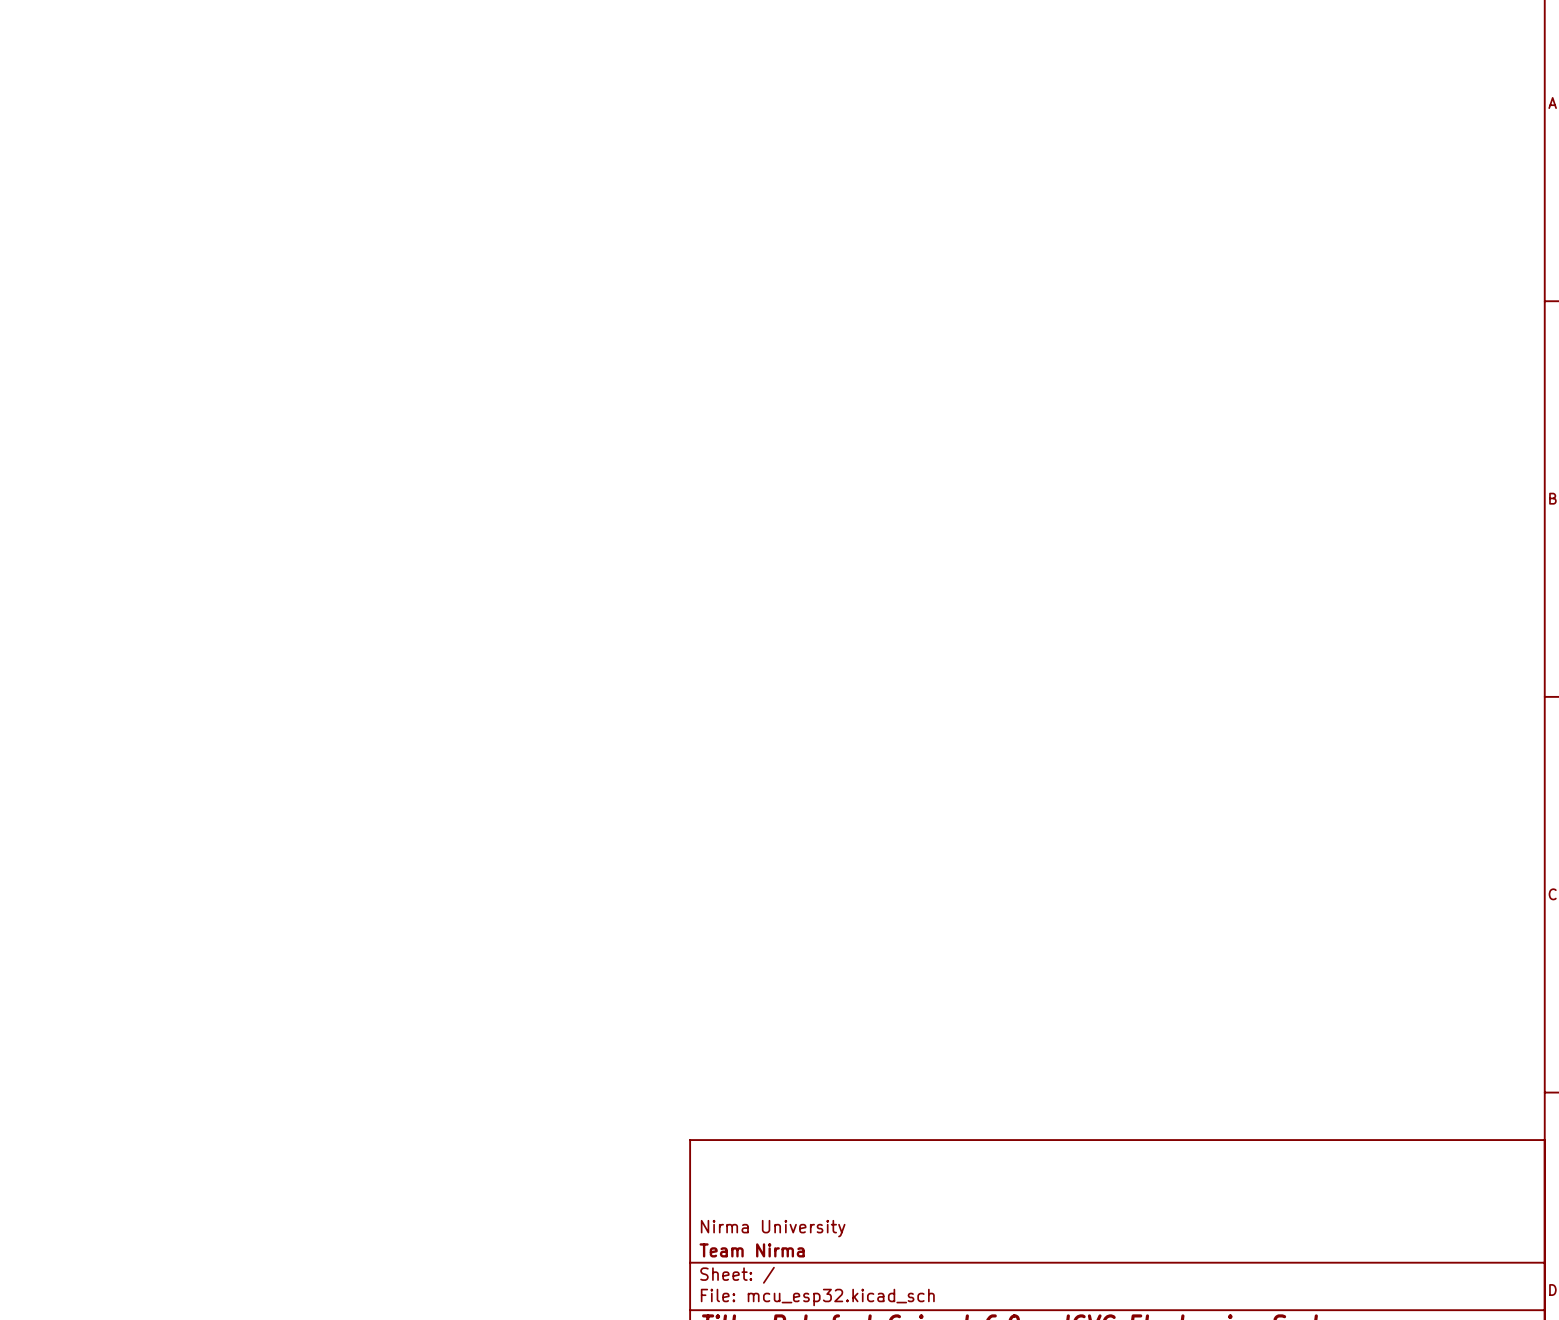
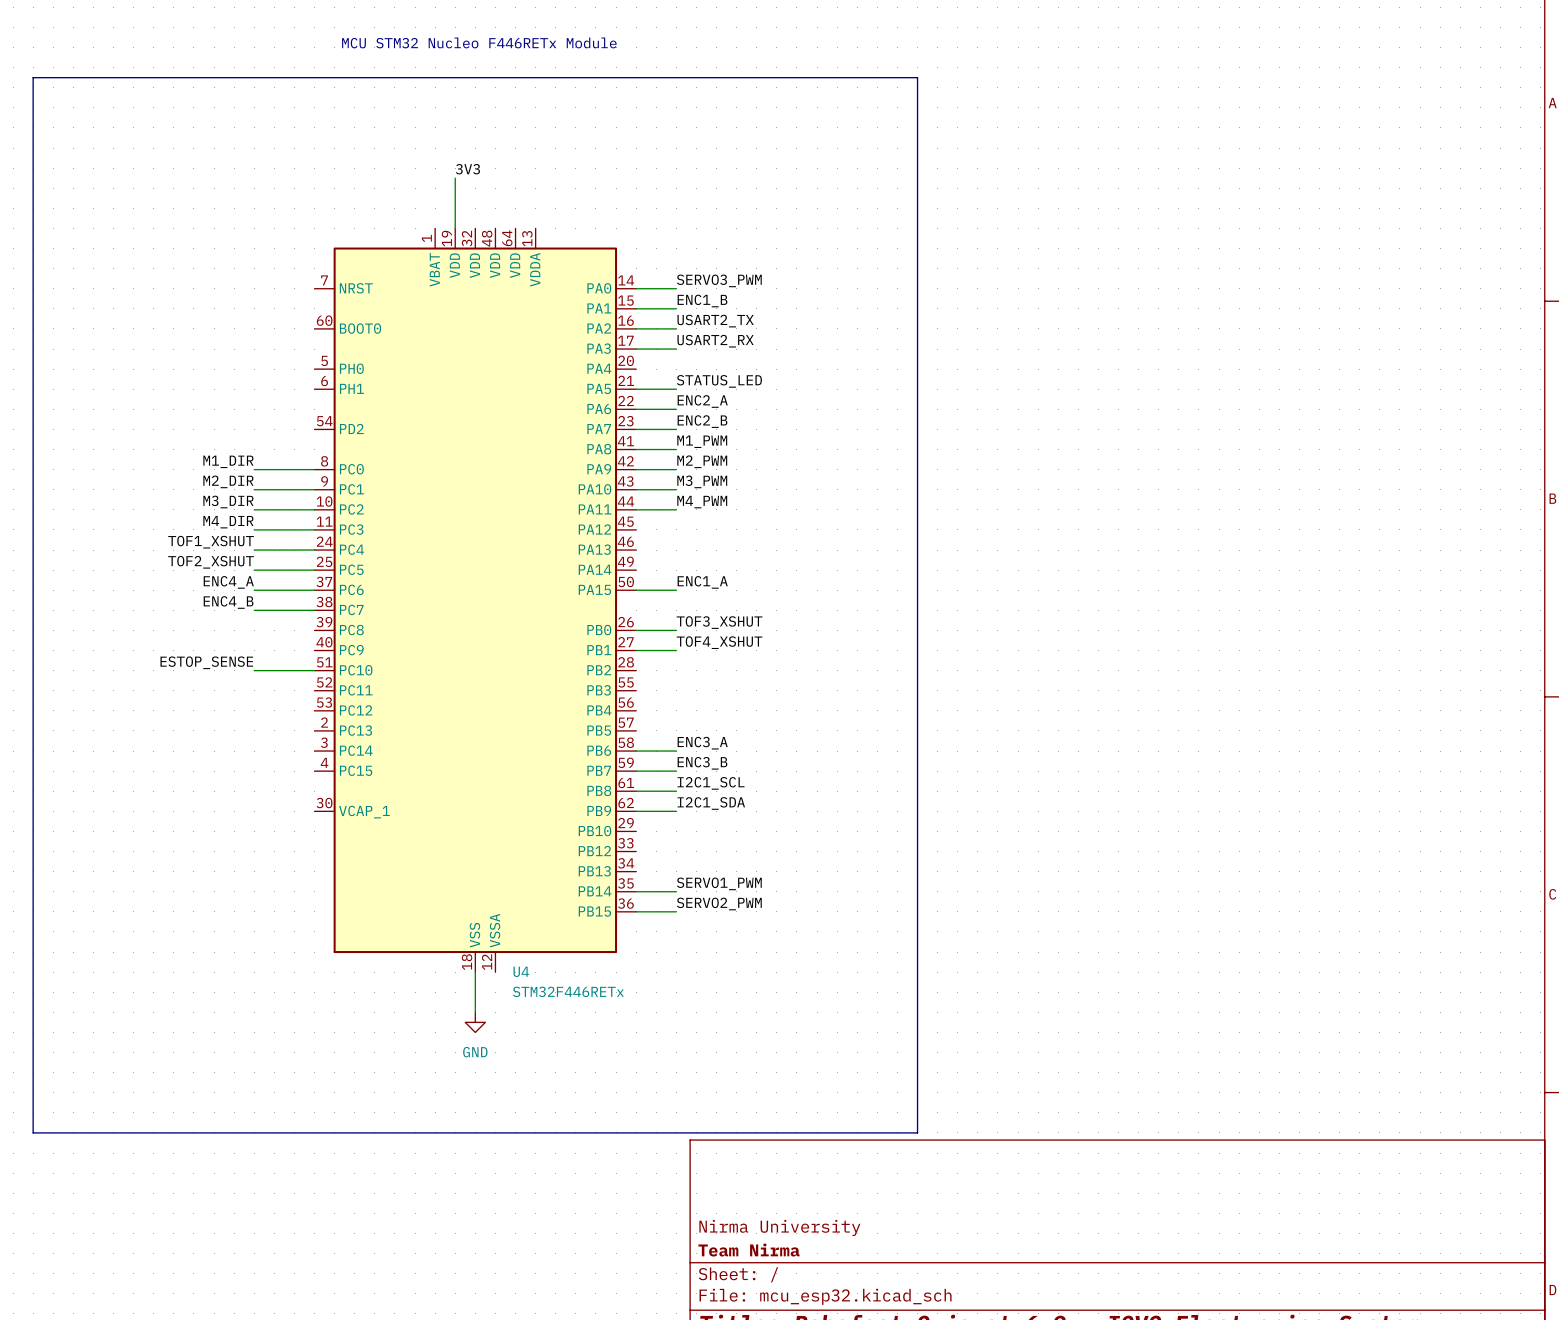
text: none -> MCU STM32 Nucleo F446RETx Module (479, 42)
line: none -> (33, 77) (917, 77) (917, 1132) (33, 1132) (33, 77)
label: none -> 3V3 (467, 169)
wire: none -> (455, 178) (455, 228)
label: none -> SERVO3_PWM (719, 280)
wire: none -> (636, 288) (676, 288)
label: none -> ENC1_B (702, 300)
wire: none -> (636, 308) (676, 308)
label: none -> USART2_TX (715, 321)
wire: none -> (636, 328) (676, 328)
label: none -> USART2_RX (715, 341)
wire: none -> (636, 349) (676, 349)
label: none -> STATUS_LED (719, 381)
wire: none -> (636, 389) (676, 389)
label: none -> ENC2_A (702, 401)
wire: none -> (636, 409) (676, 409)
label: none -> ENC2_B (702, 421)
wire: none -> (636, 429) (676, 429)
label: none -> M1_PWM (702, 441)
wire: none -> (636, 449) (676, 449)
label: none -> M1_DIR (228, 461)
label: none -> M2_PWM (702, 461)
wire: none -> (254, 469) (314, 469)
wire: none -> (636, 469) (676, 469)
label: none -> M2_DIR (228, 481)
label: none -> M3_PWM (702, 481)
wire: none -> (254, 489) (314, 489)
wire: none -> (636, 489) (676, 489)
label: none -> M3_DIR (228, 501)
label: none -> M4_PWM (702, 502)
wire: none -> (254, 509) (314, 509)
wire: none -> (636, 509) (676, 509)
label: none -> M4_DIR (228, 522)
wire: none -> (254, 529) (314, 529)
label: none -> TOF1_XSHUT (211, 542)
wire: none -> (254, 550) (314, 550)
label: none -> TOF2_XSHUT (211, 562)
wire: none -> (254, 570) (314, 570)
label: none -> ENC4_A (228, 582)
label: none -> ENC1_A (702, 582)
wire: none -> (254, 590) (314, 590)
wire: none -> (636, 590) (676, 590)
U4: none -> STM32F446RETx (475, 600)
label: none -> ENC4_B (228, 602)
wire: none -> (254, 610) (314, 610)
label: none -> TOF3_XSHUT (719, 622)
wire: none -> (636, 630) (676, 630)
label: none -> TOF4_XSHUT (719, 642)
wire: none -> (636, 650) (676, 650)
label: none -> ESTOP_SENSE (206, 662)
wire: none -> (254, 670) (314, 670)
label: none -> ENC3_A (702, 743)
wire: none -> (636, 751) (676, 751)
label: none -> ENC3_B (702, 763)
wire: none -> (636, 771) (676, 771)
label: none -> I2C1_SCL (711, 783)
wire: none -> (636, 791) (676, 791)
label: none -> I2C1_SDA (711, 803)
wire: none -> (636, 811) (676, 811)
label: none -> SERVO1_PWM (719, 883)
wire: none -> (636, 891) (676, 891)
label: none -> SERVO2_PWM (719, 903)
wire: none -> (636, 911) (676, 911)
wire: none -> (475, 972) (475, 1012)
power symbol: none -> GND (475, 1022)

